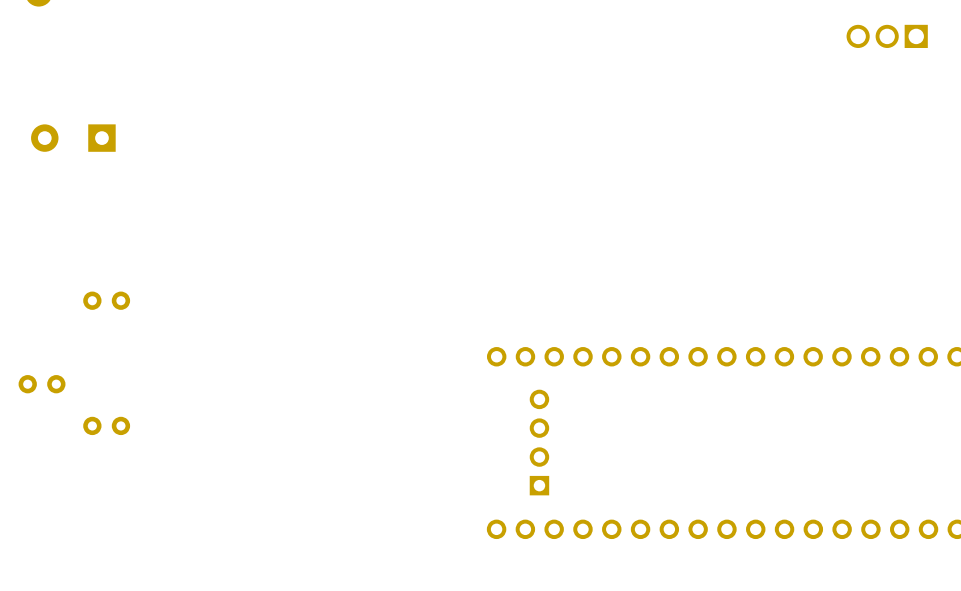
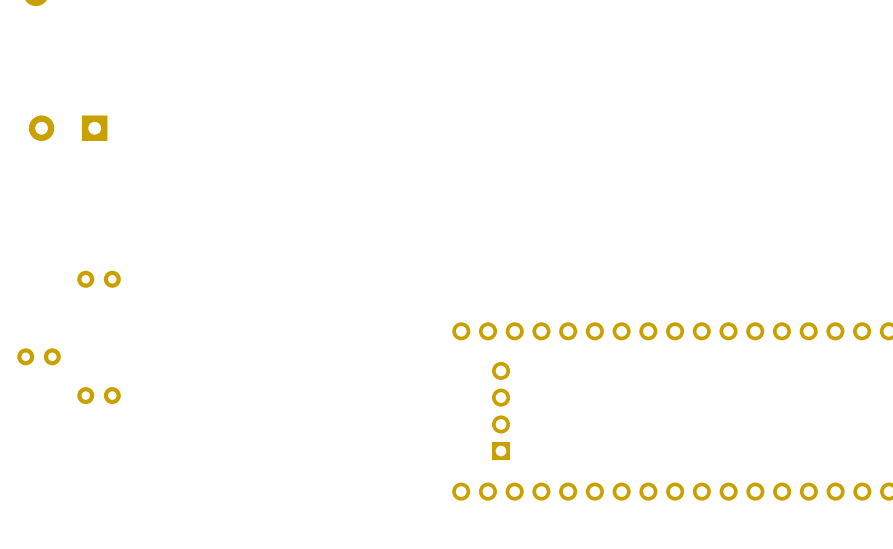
part: (887, 36) -> none

